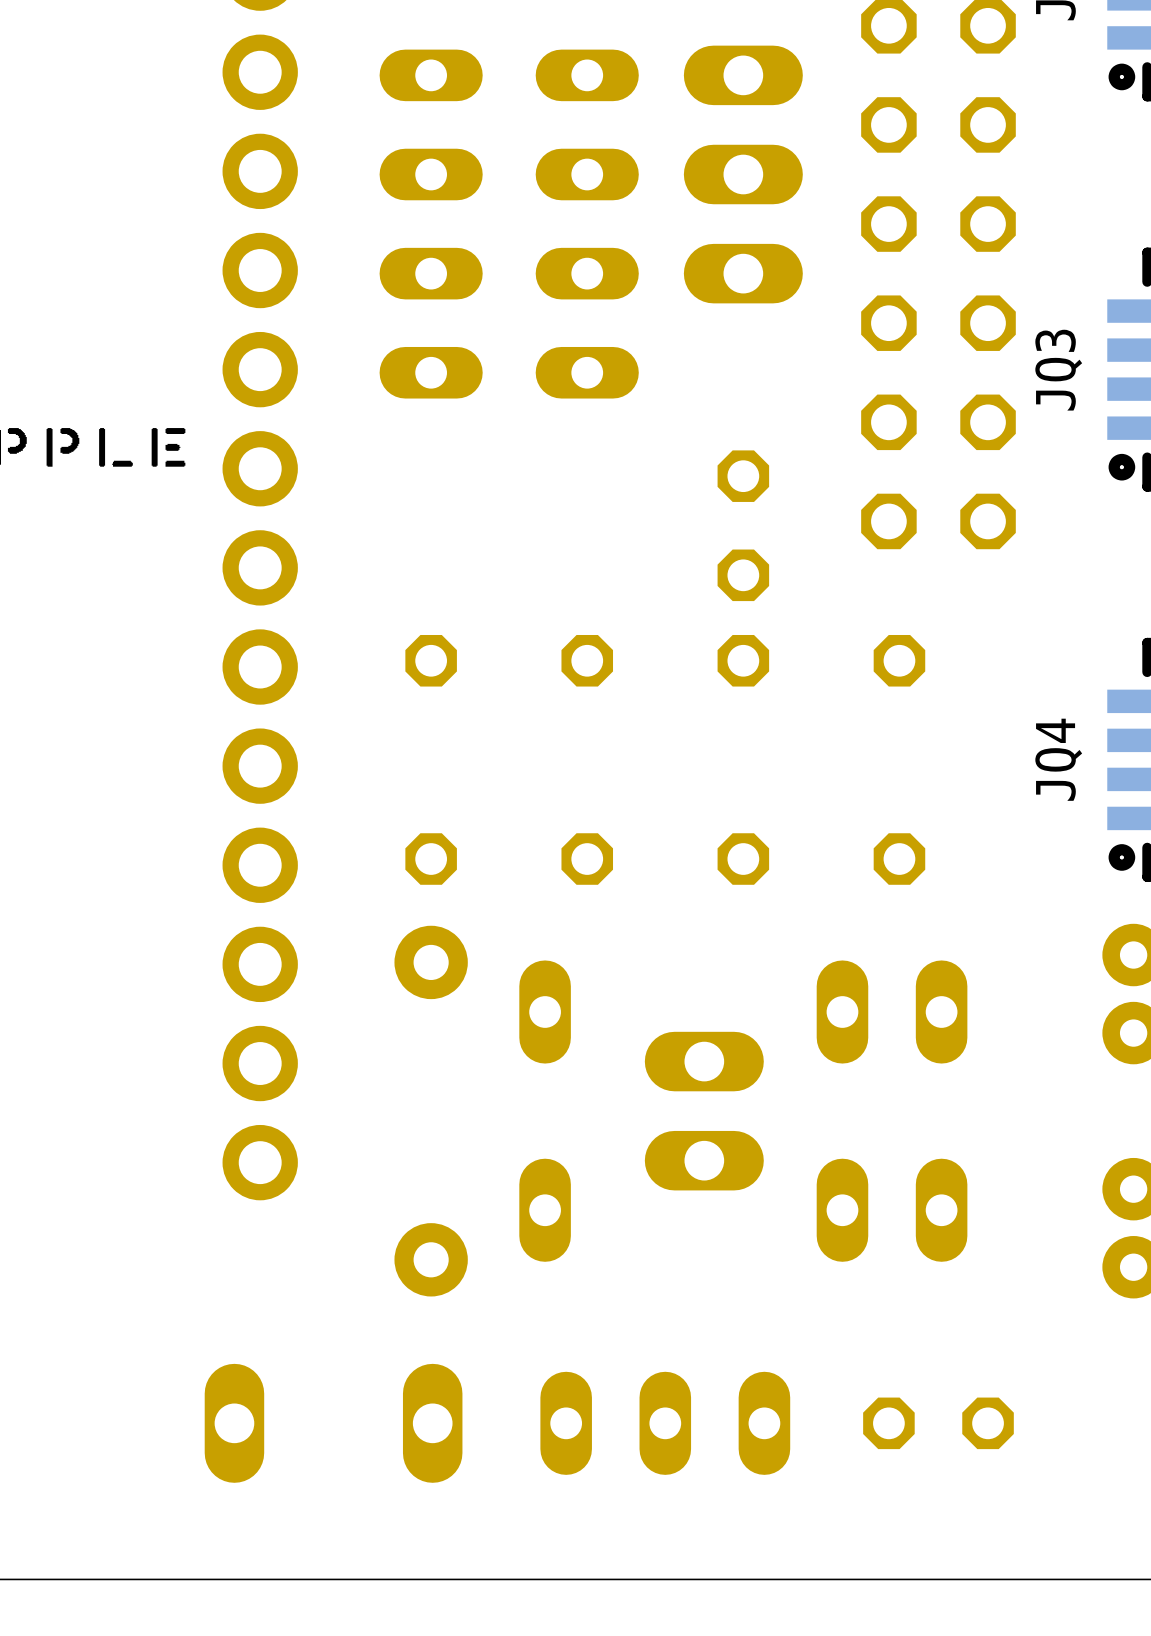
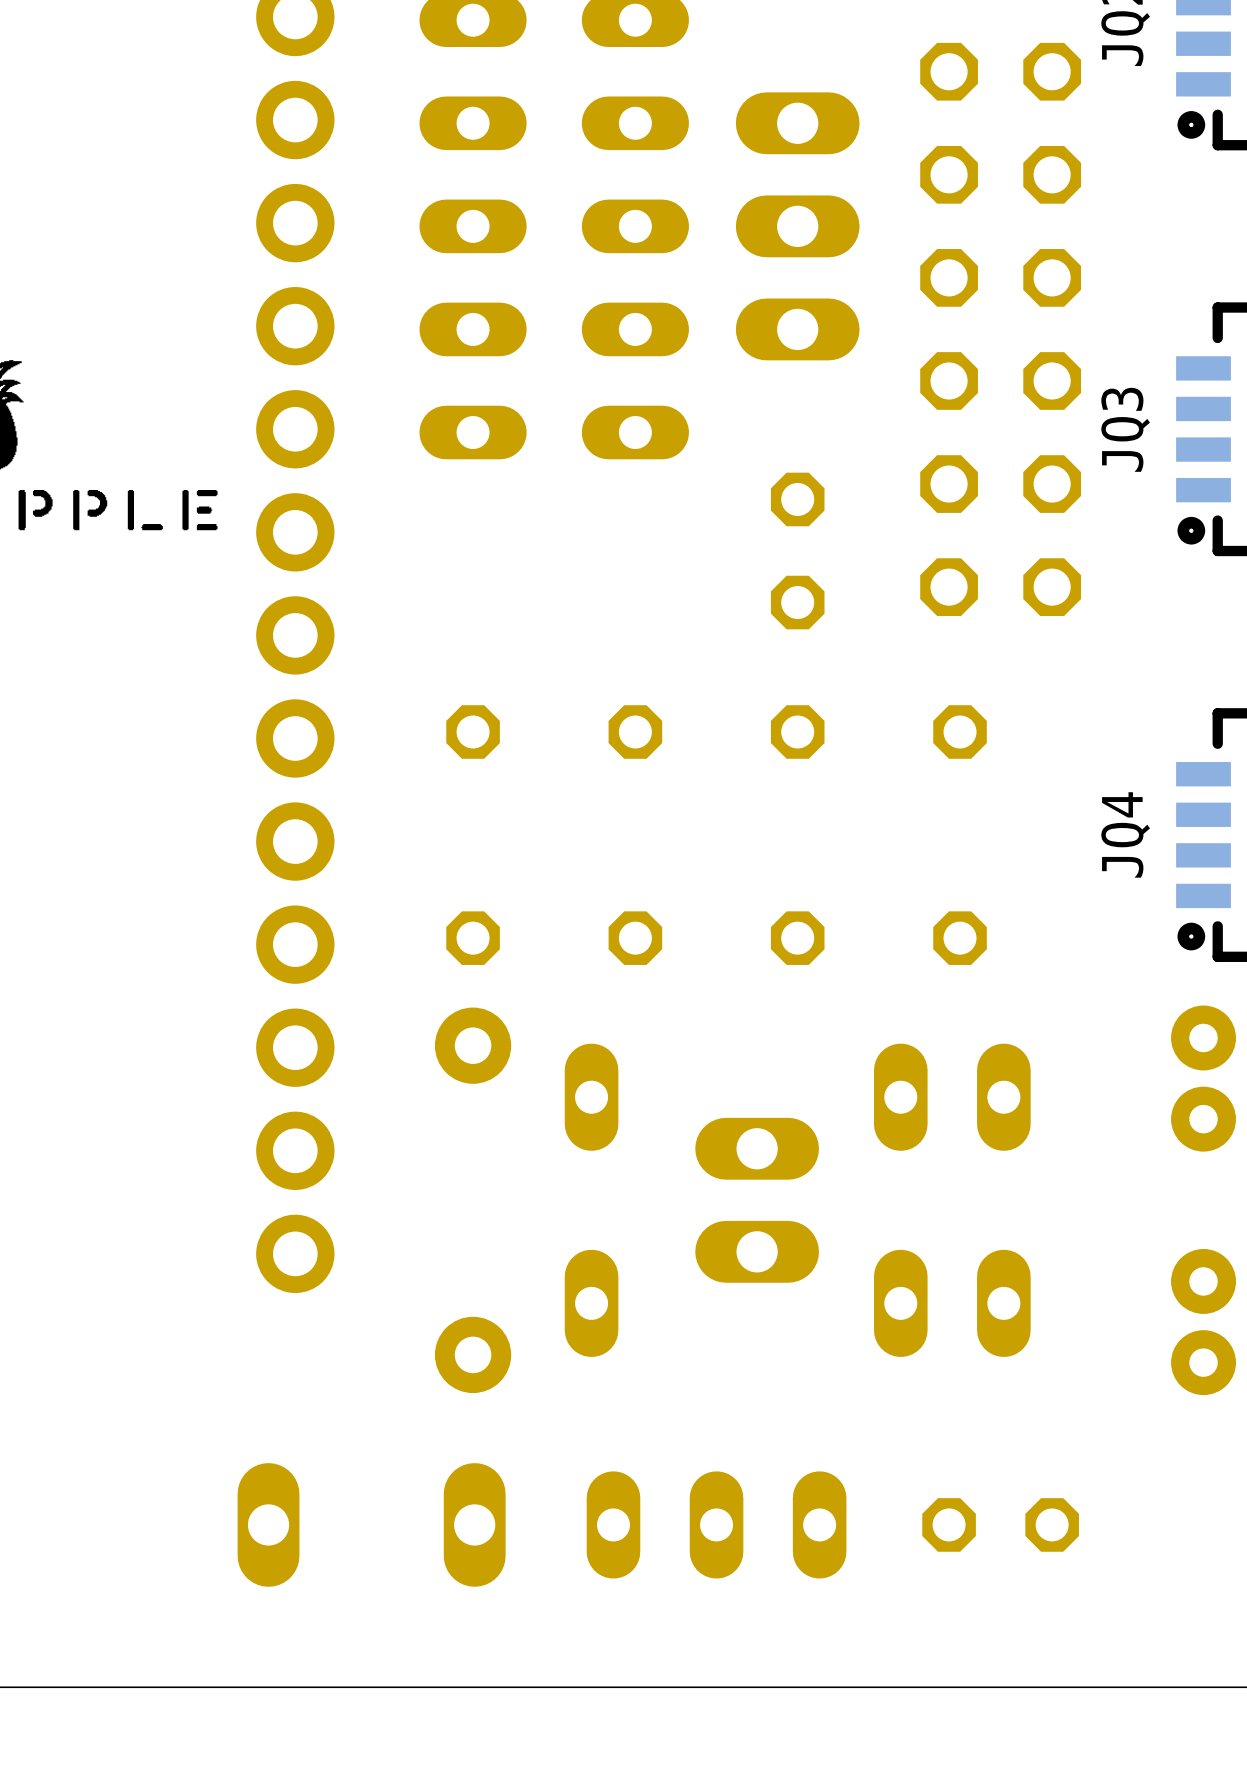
part position: (743, 525) -> (797, 551)

